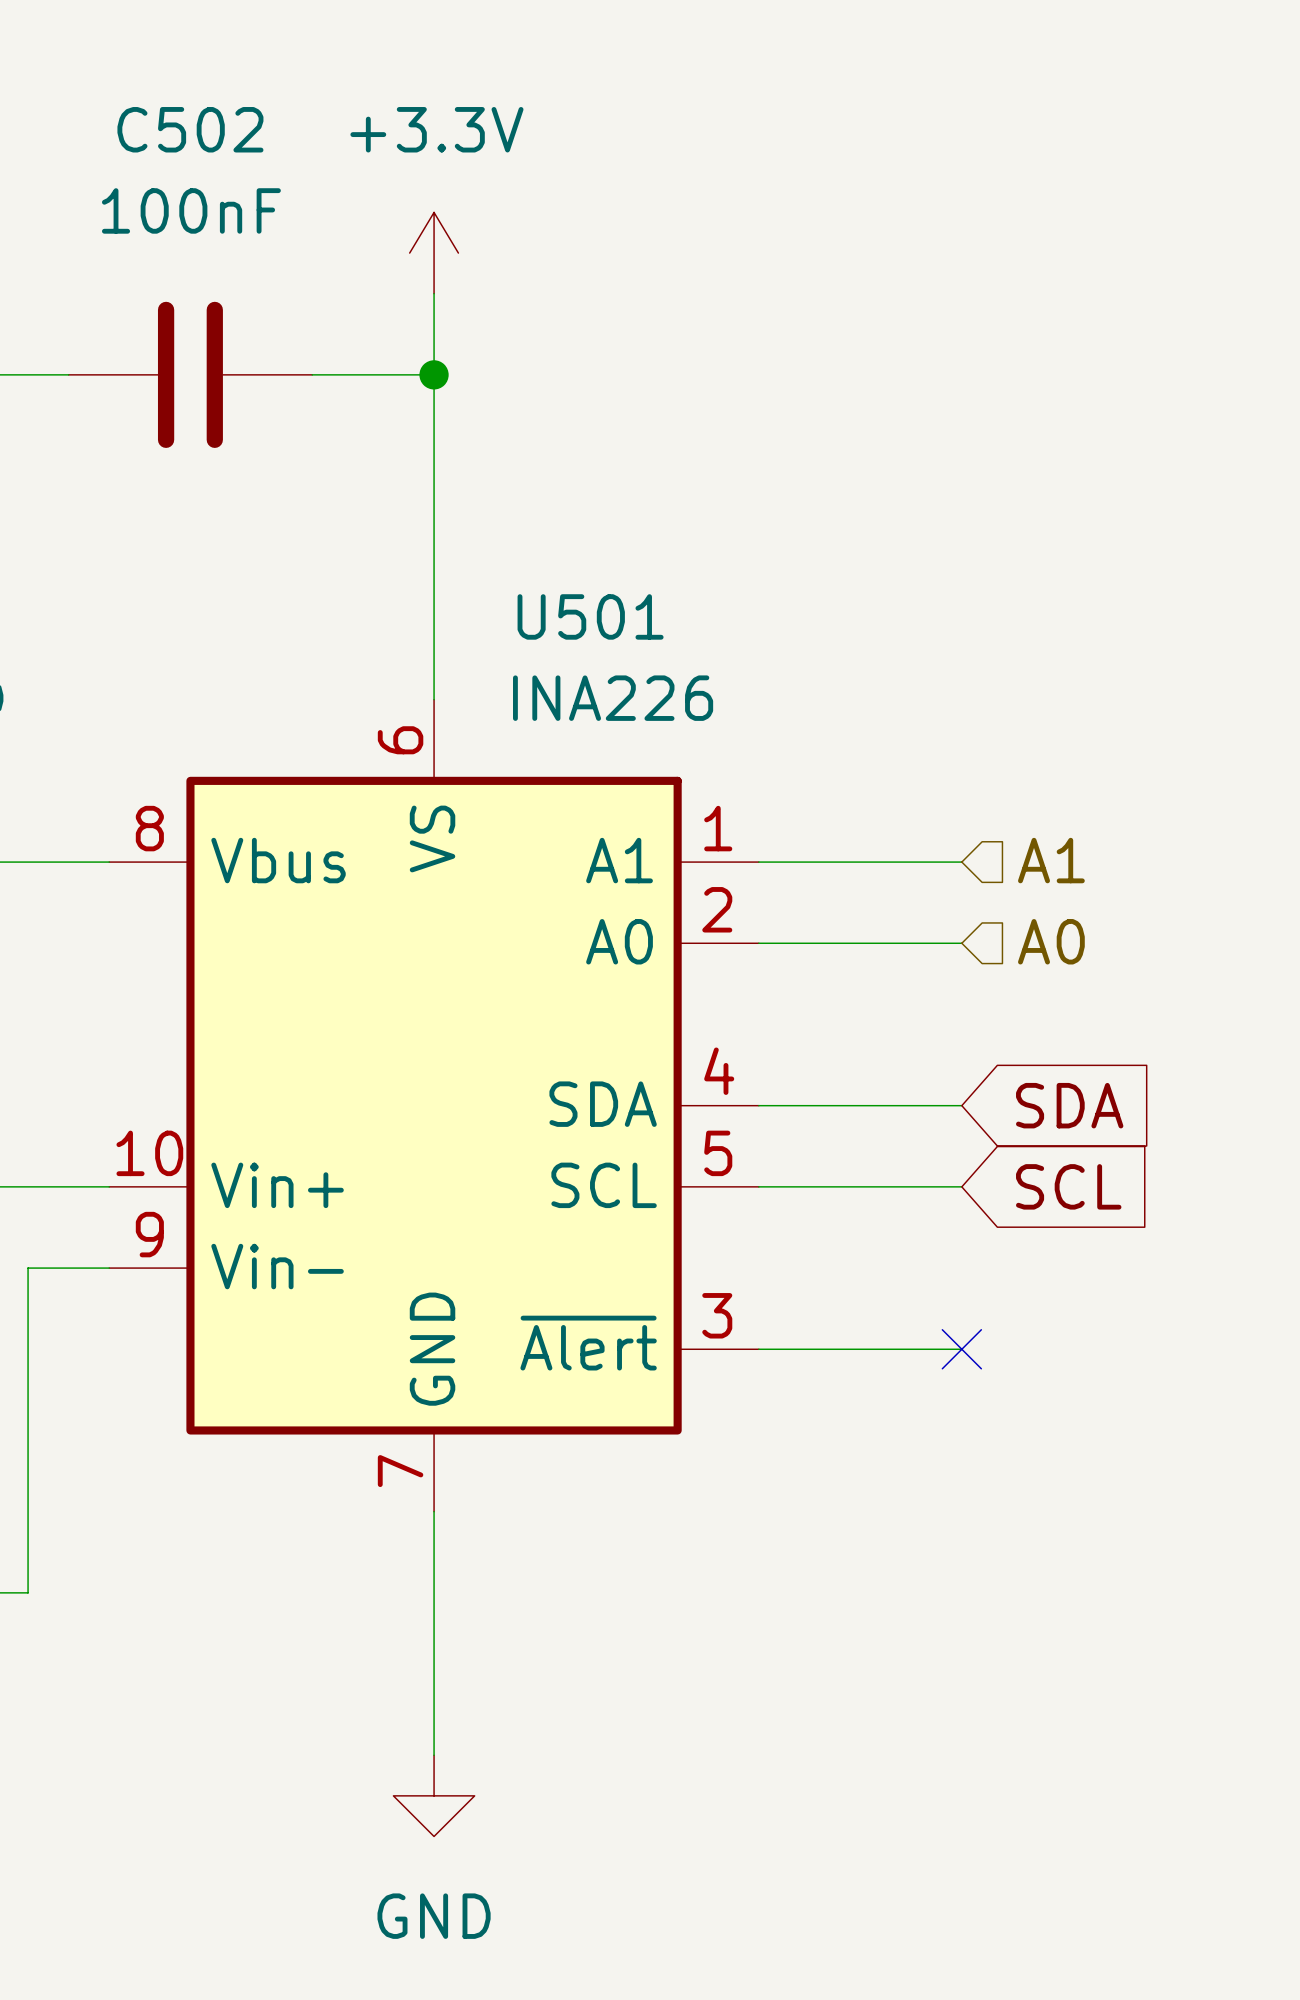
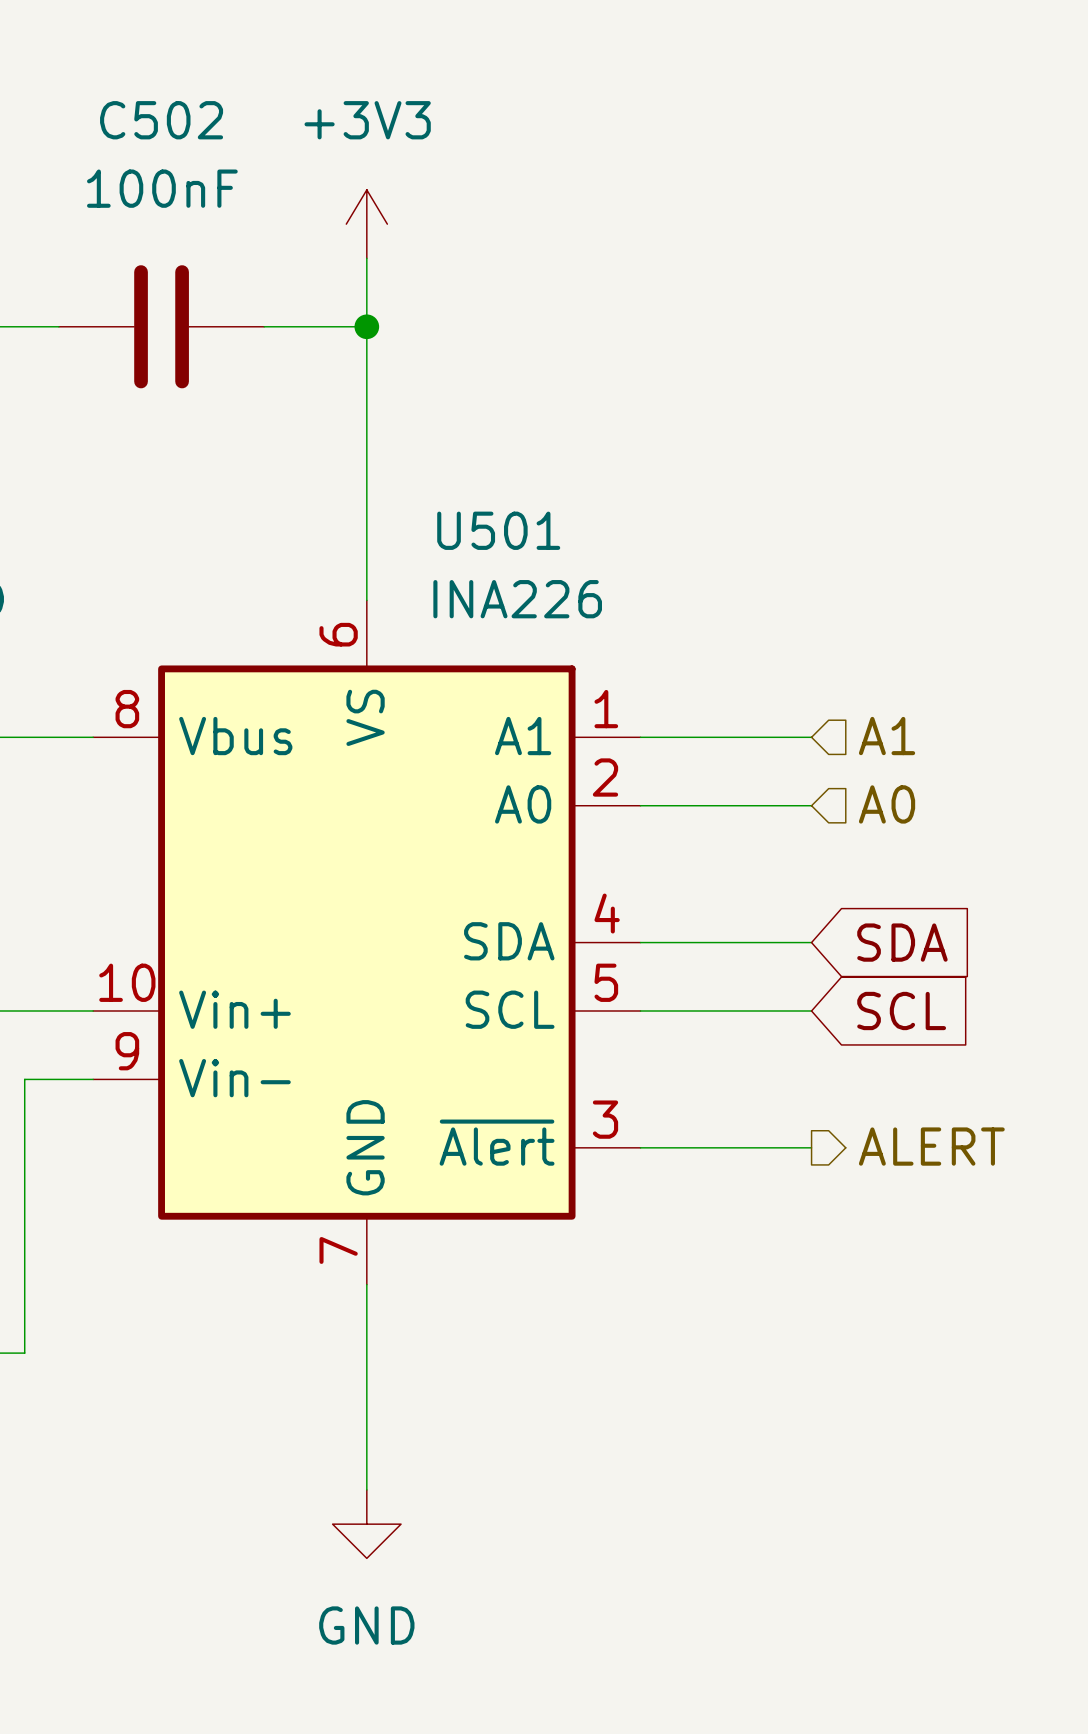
power symbol: +3.3V (434, 253) -> +3V3 (366, 224)
hierarchical label: none -> ALERT (931, 1146)
no-connect mark: (961, 1349) -> none

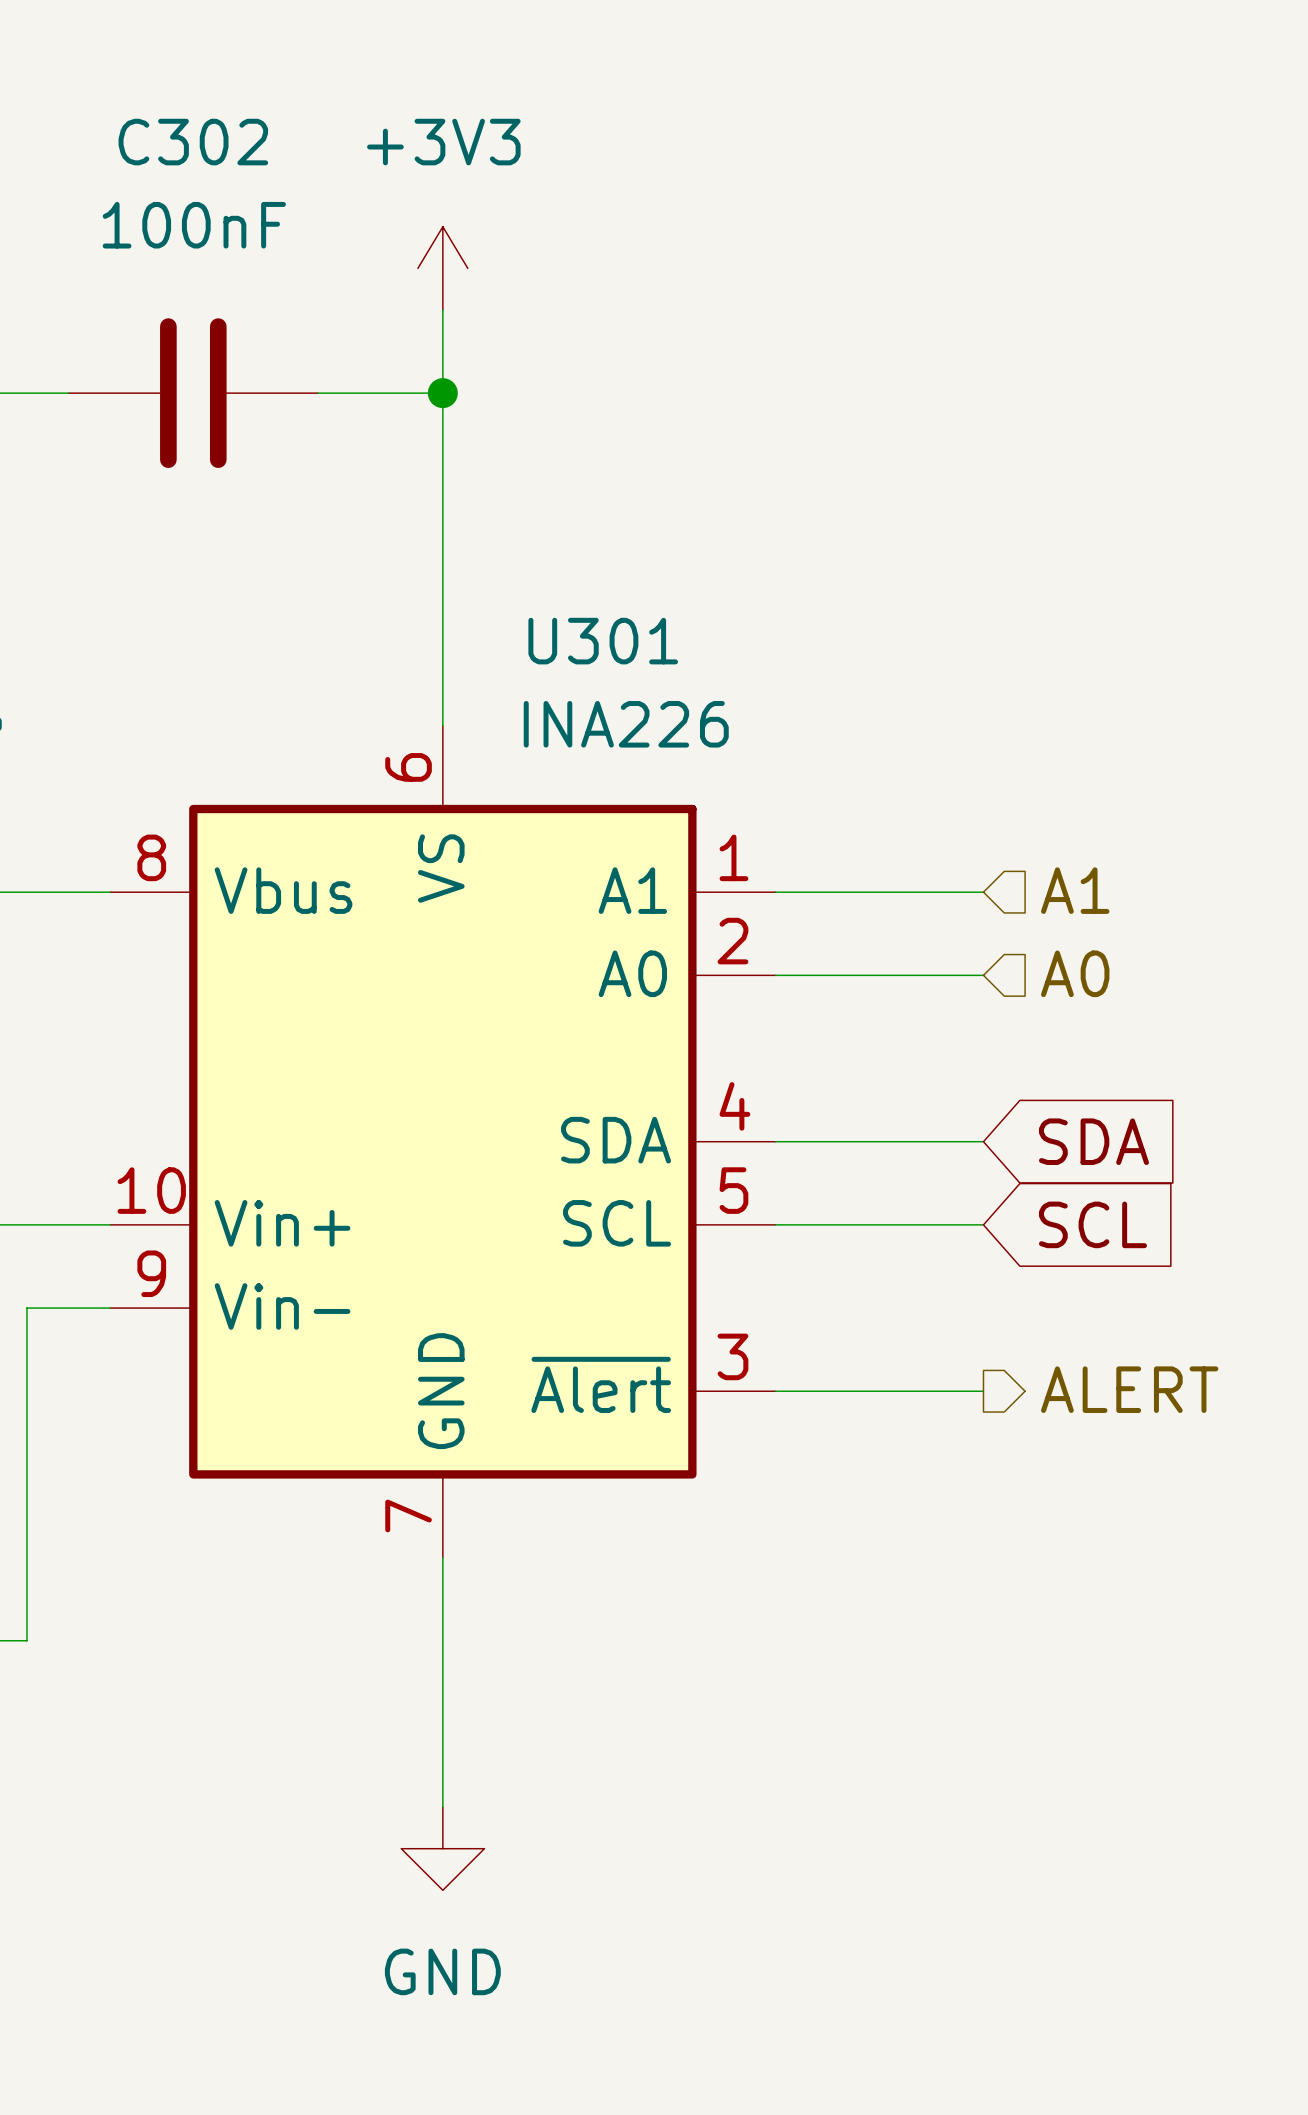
C502 name: C502 (161, 120) -> C302 (193, 142)
U501 name: U501 (498, 530) -> U301 (603, 641)

